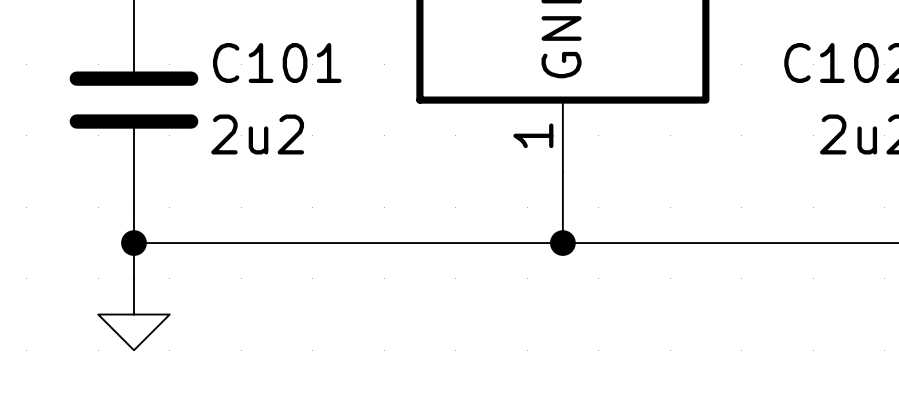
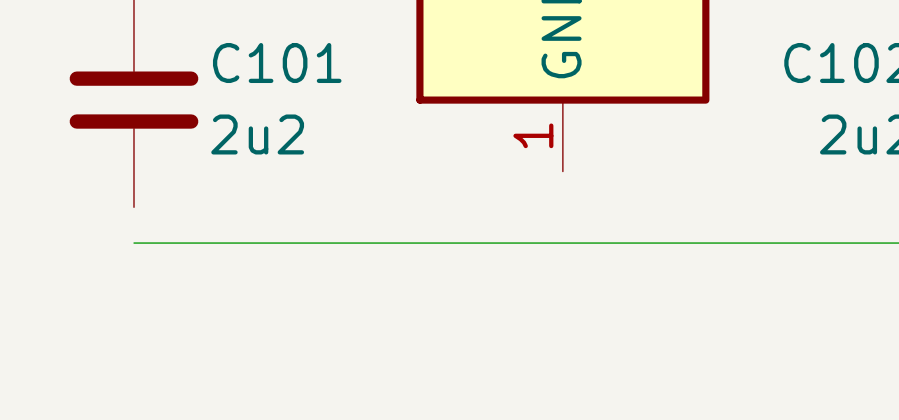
wire: (562, 171) (562, 243) -> none
wire: (133, 207) (133, 278) -> none
junction: (133, 243) -> none
junction: (562, 243) -> none
power symbol: (133, 314) -> none

